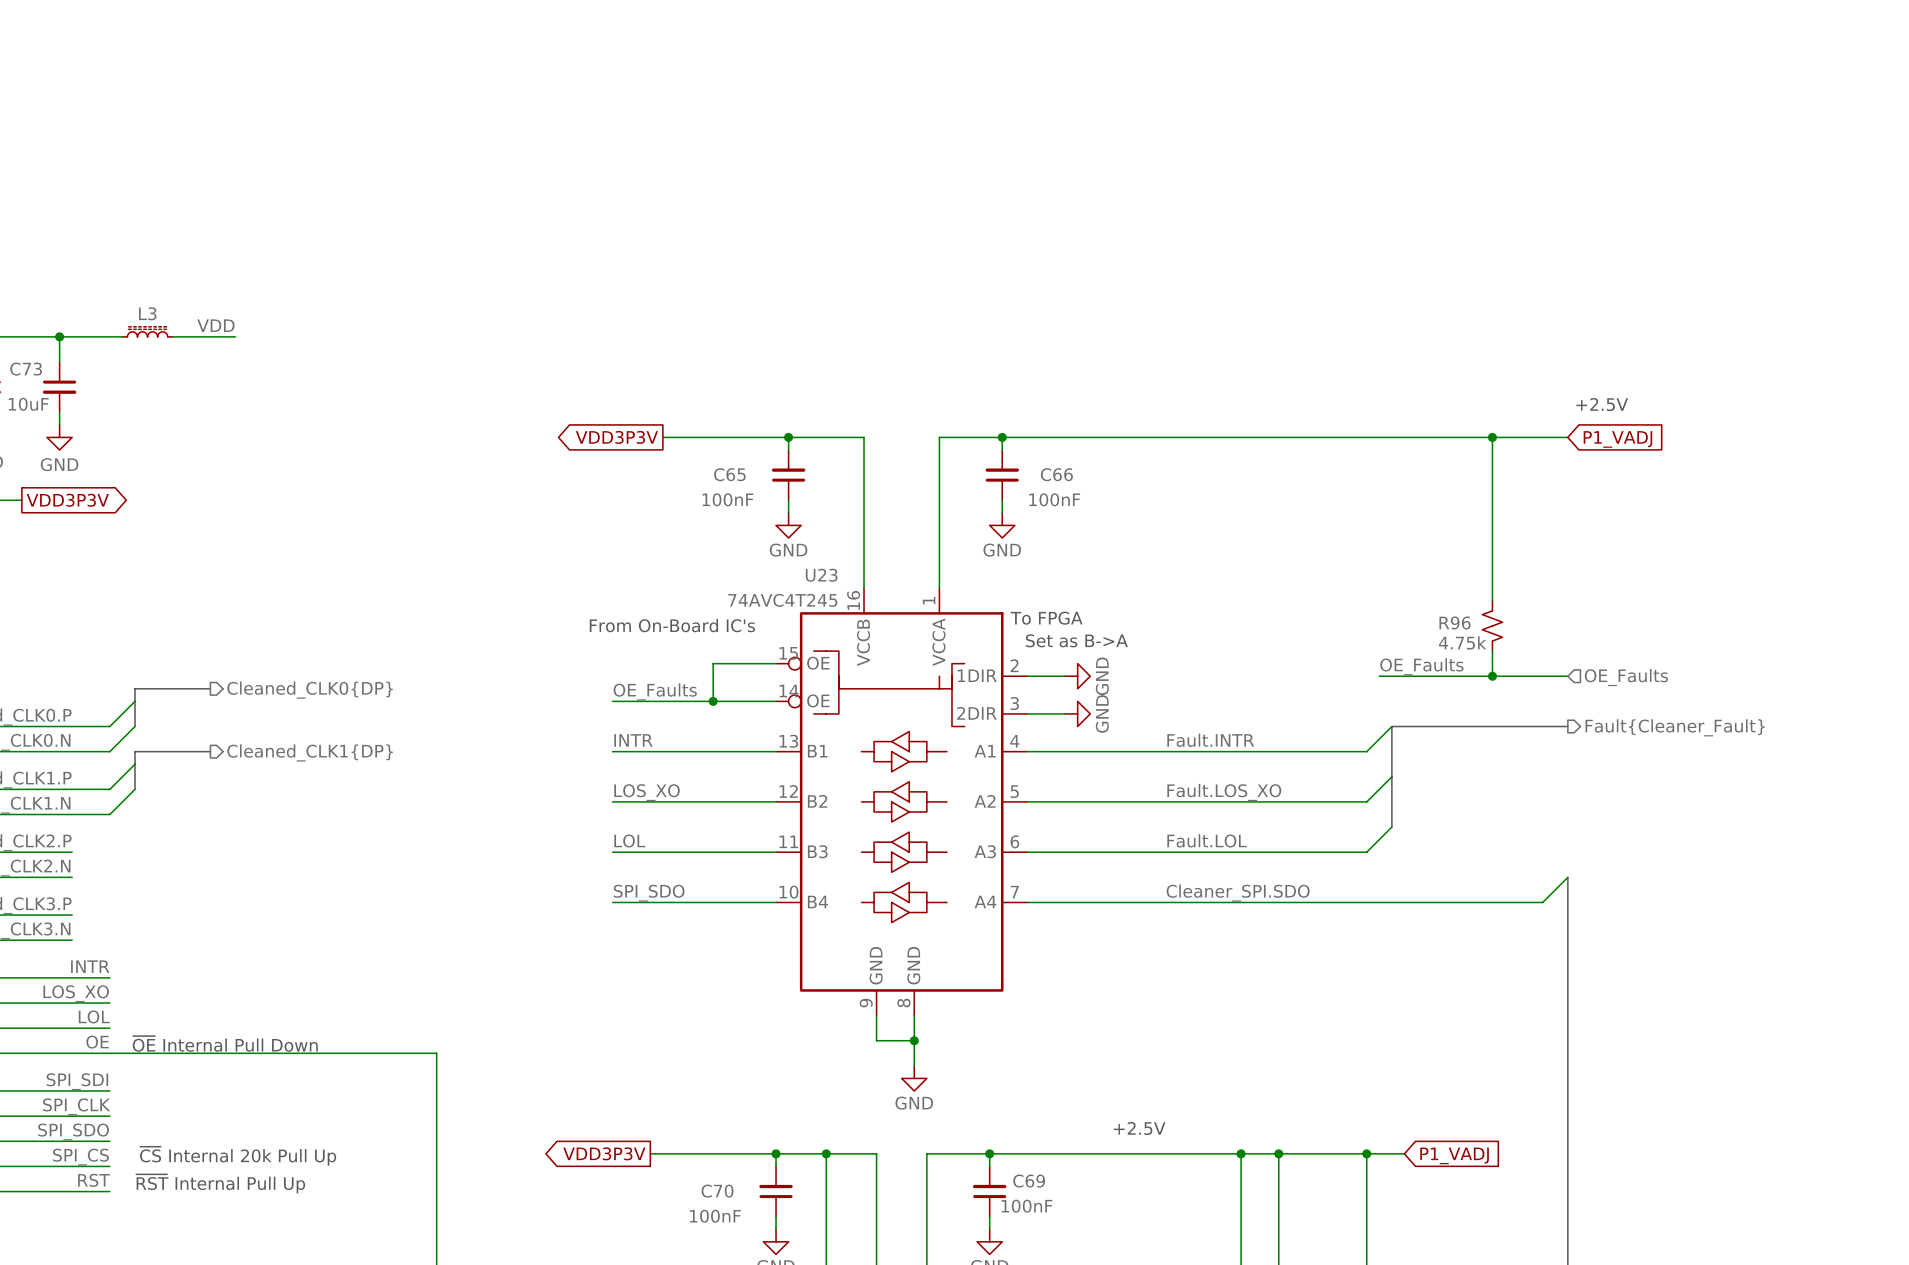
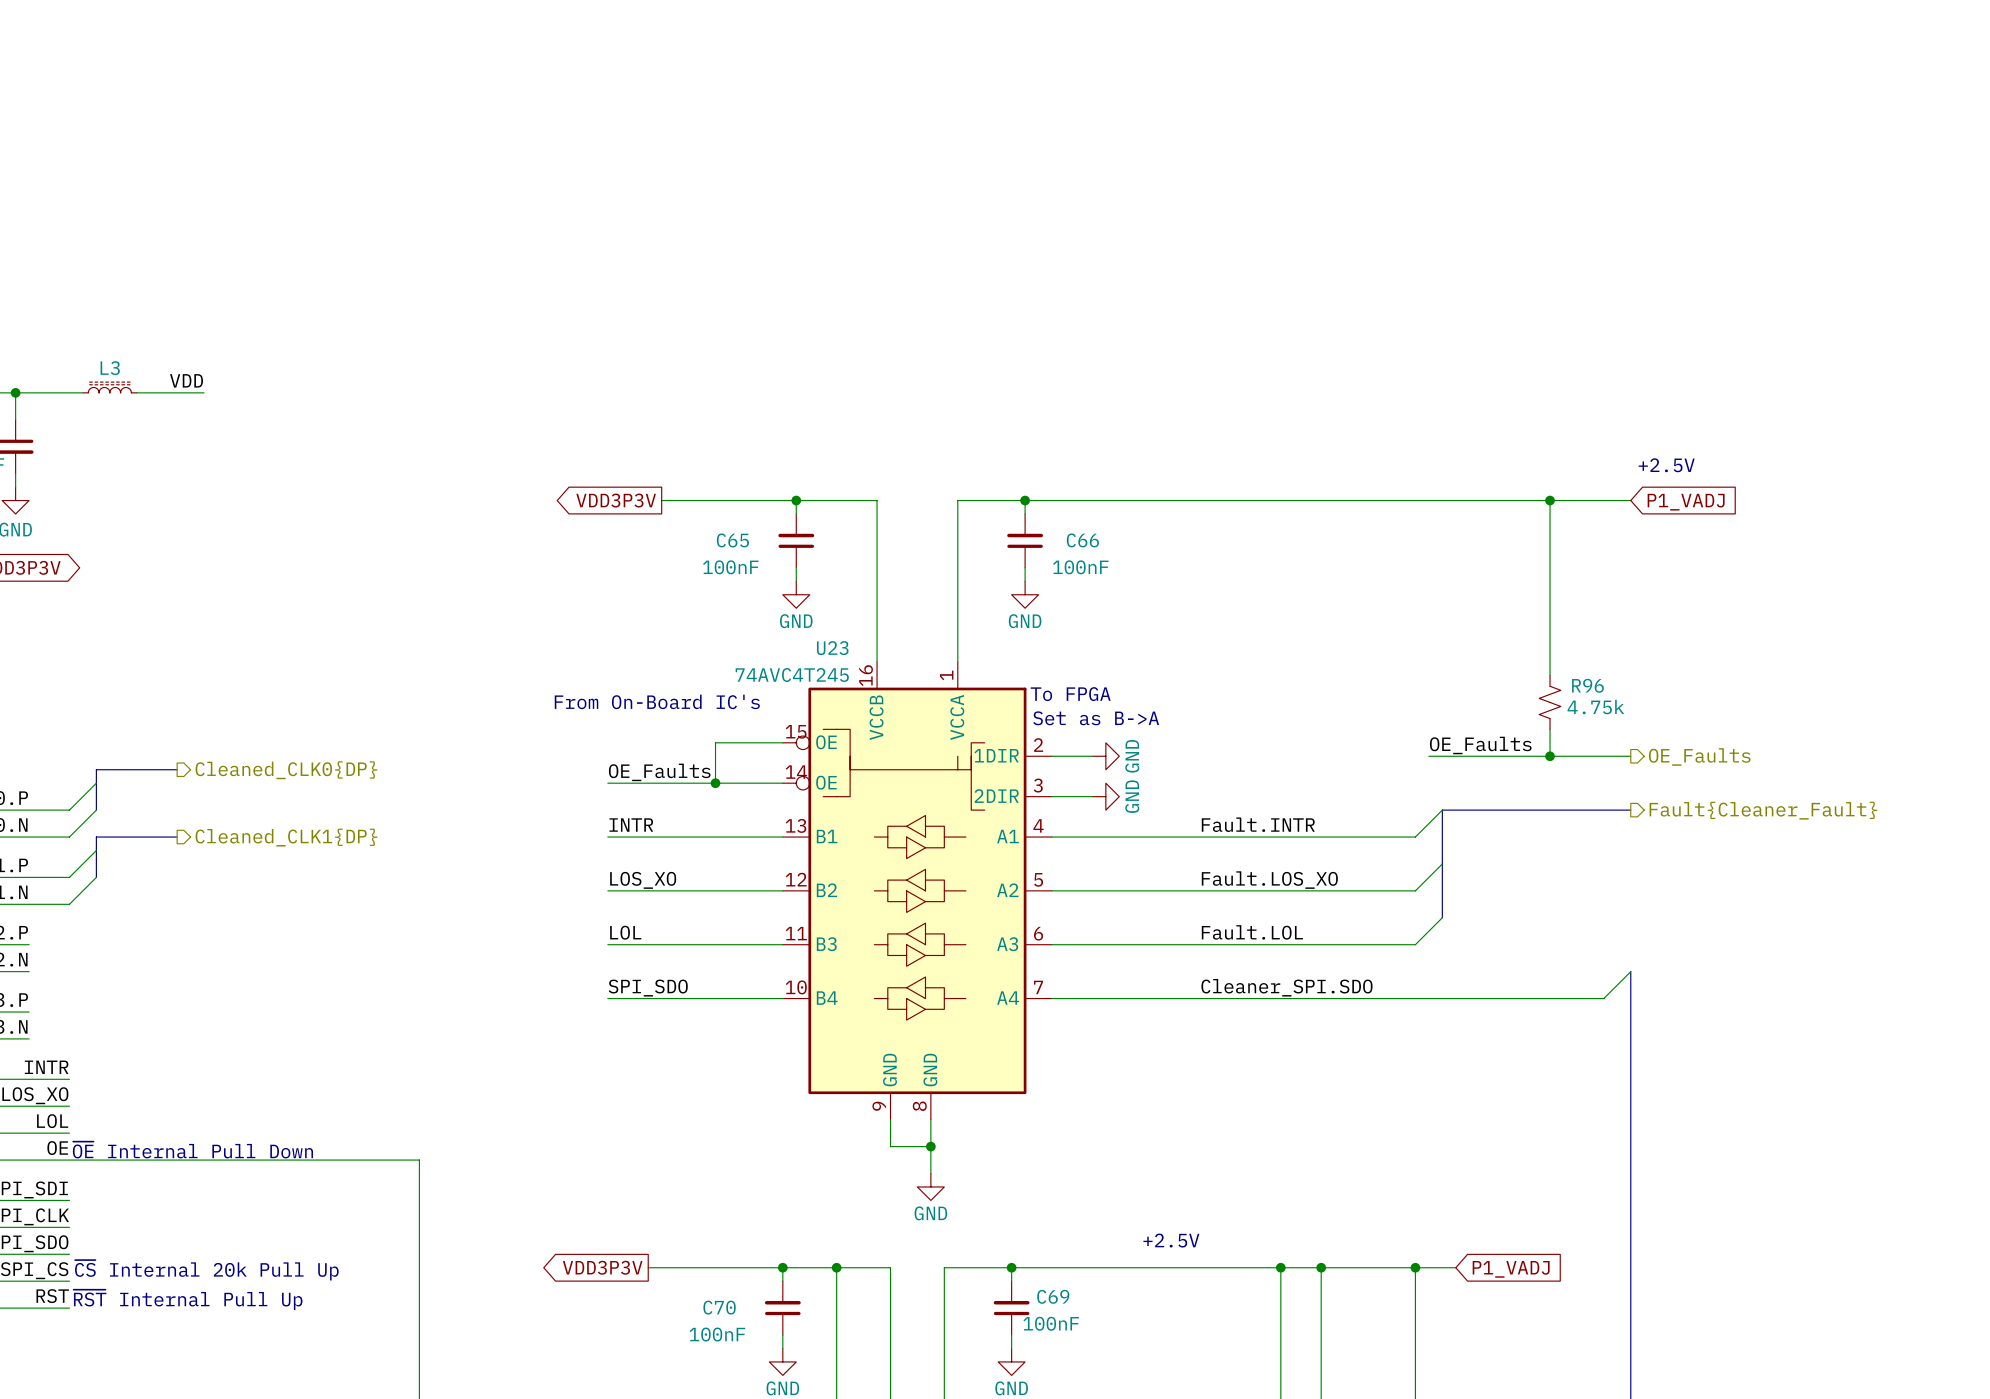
R96 flip: as is (1492, 625) -> left-right (1550, 702)
hierarchical label shape: input (1626, 677) -> output (1699, 756)

